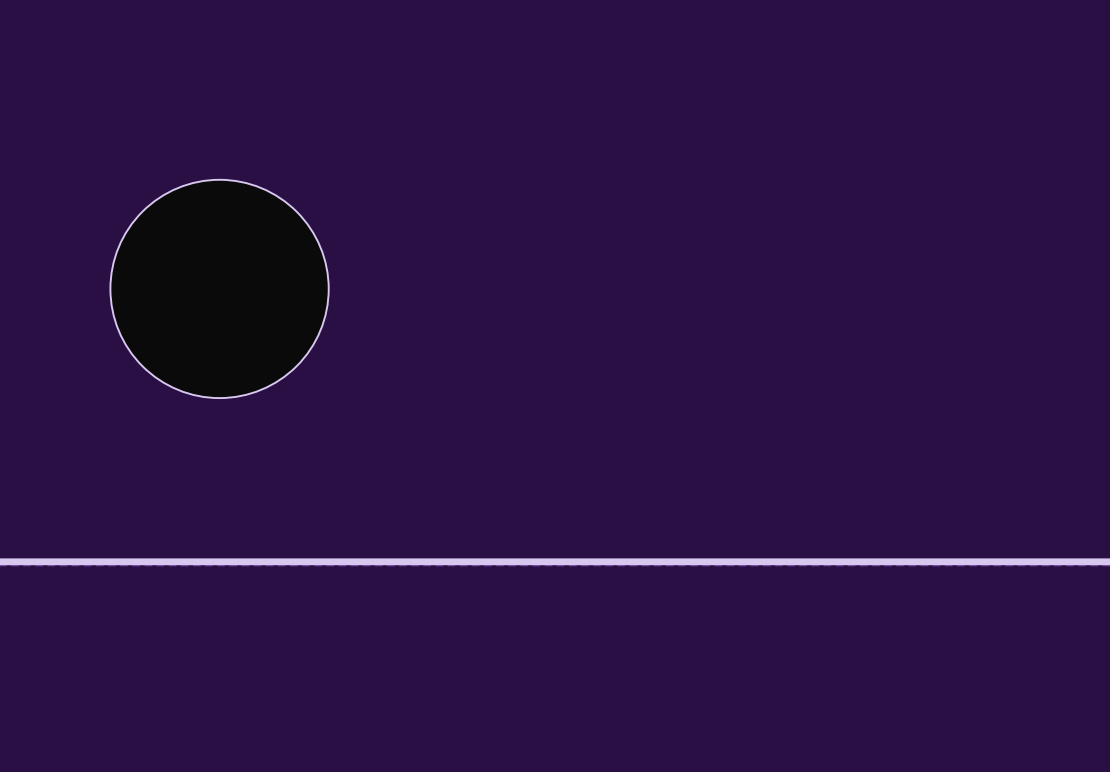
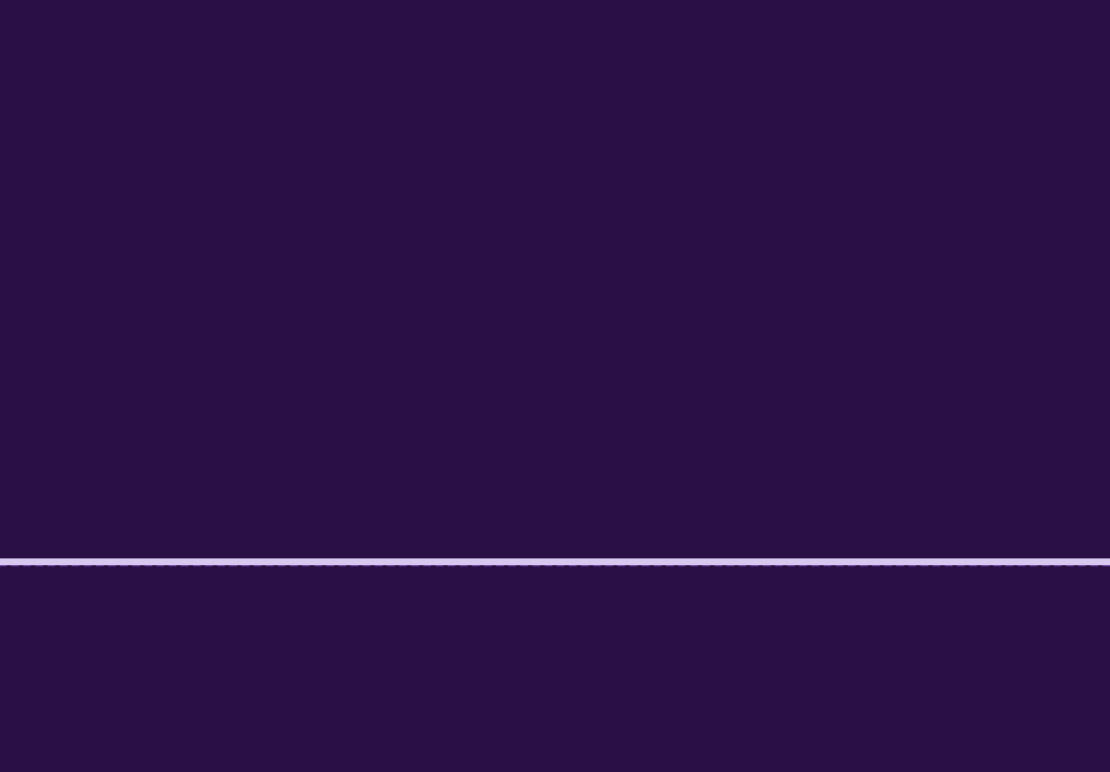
part: (219, 288) -> none

